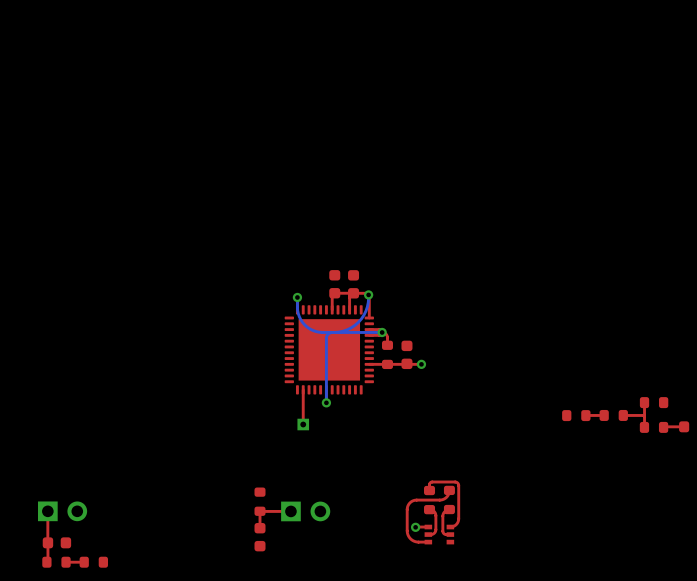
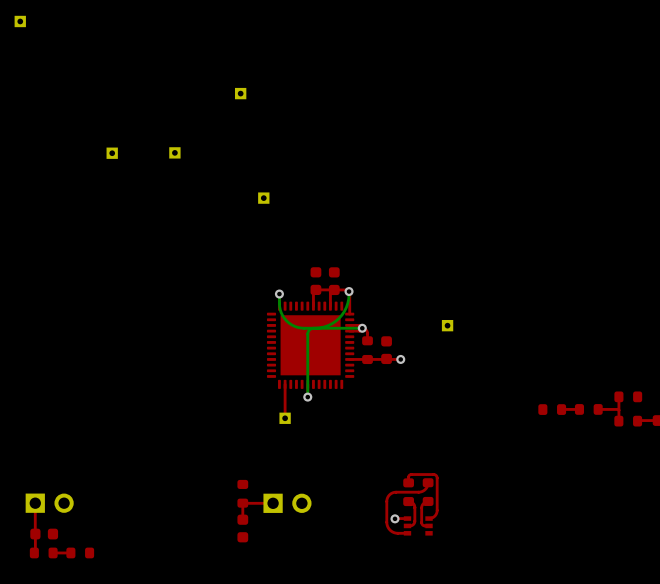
part: none -> (20, 21)
part: none -> (240, 93)
part: none -> (112, 153)
part: none -> (174, 152)
part: none -> (263, 198)
part: none -> (447, 325)

